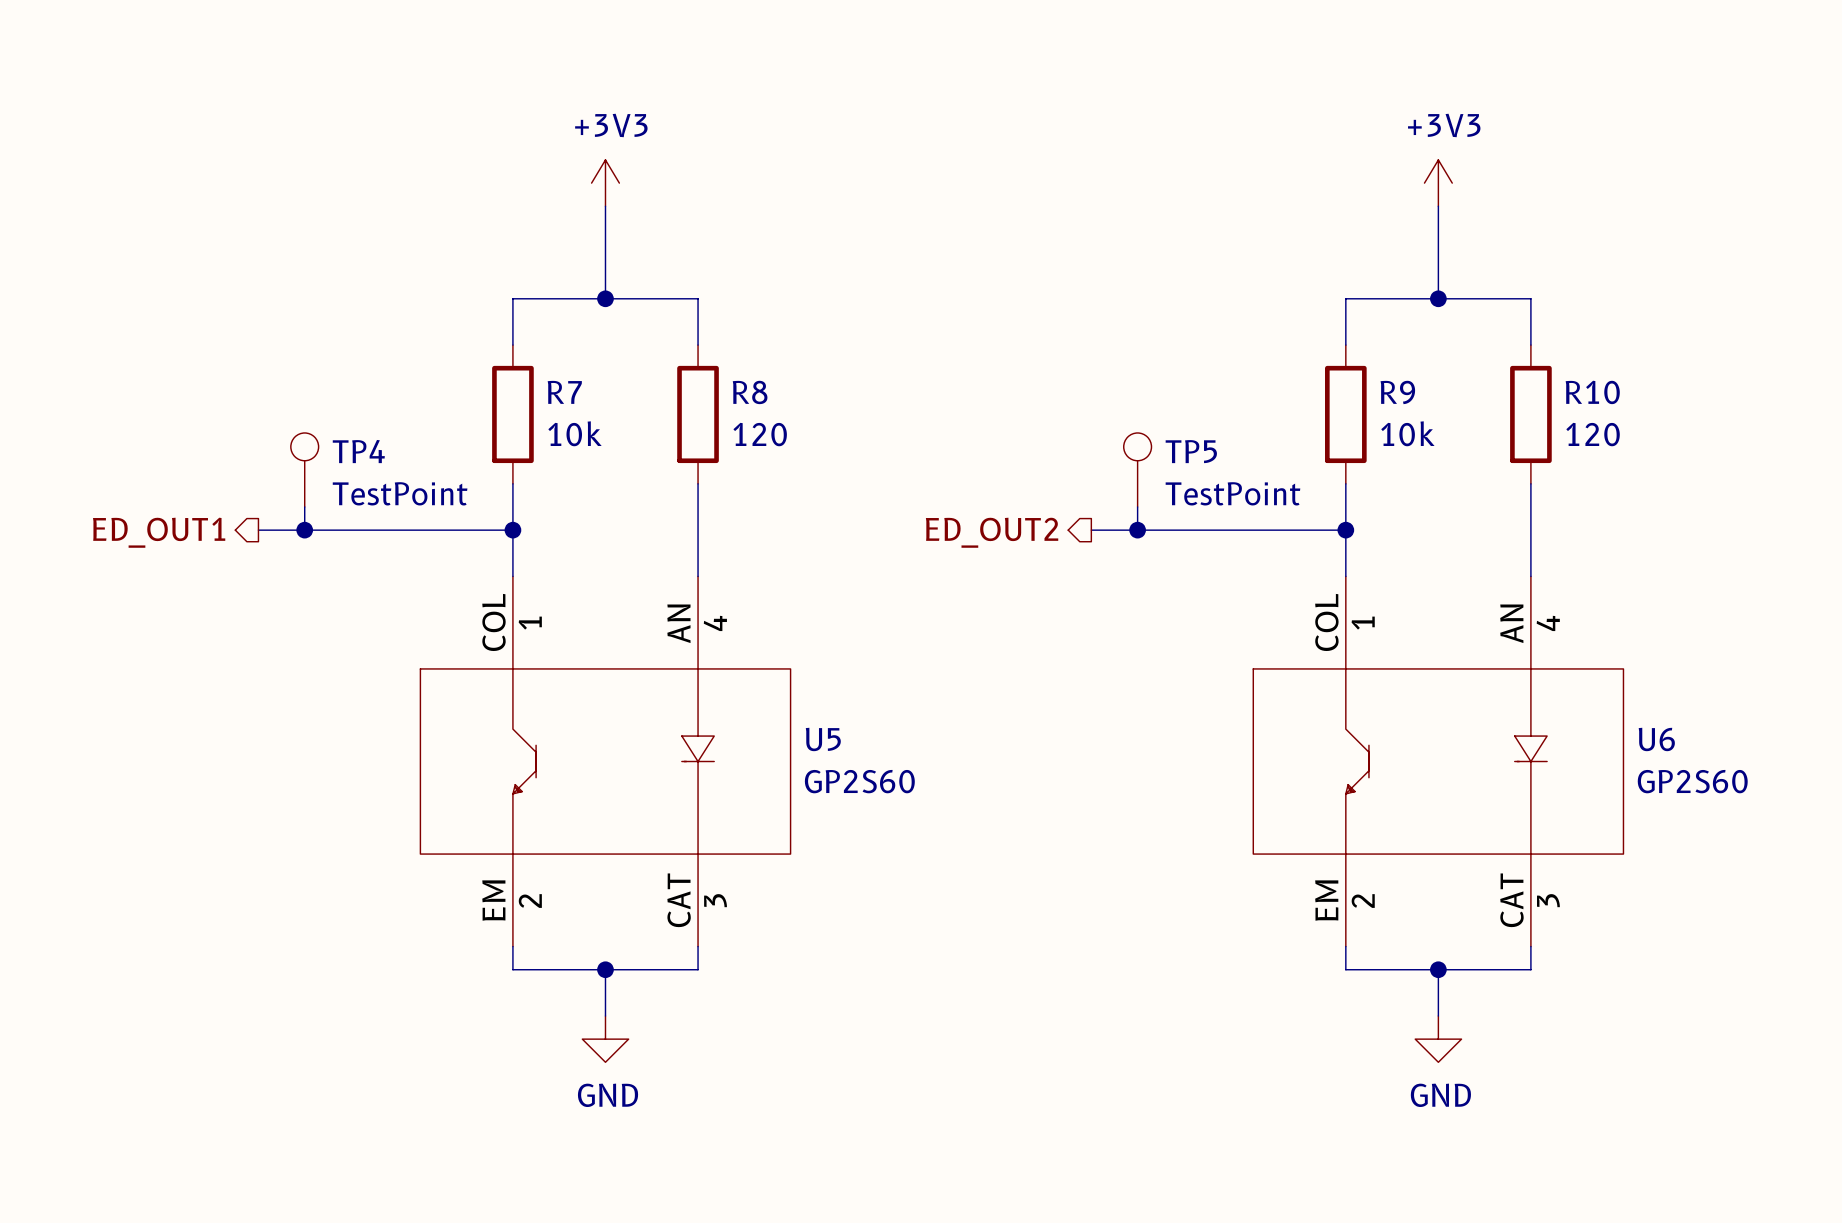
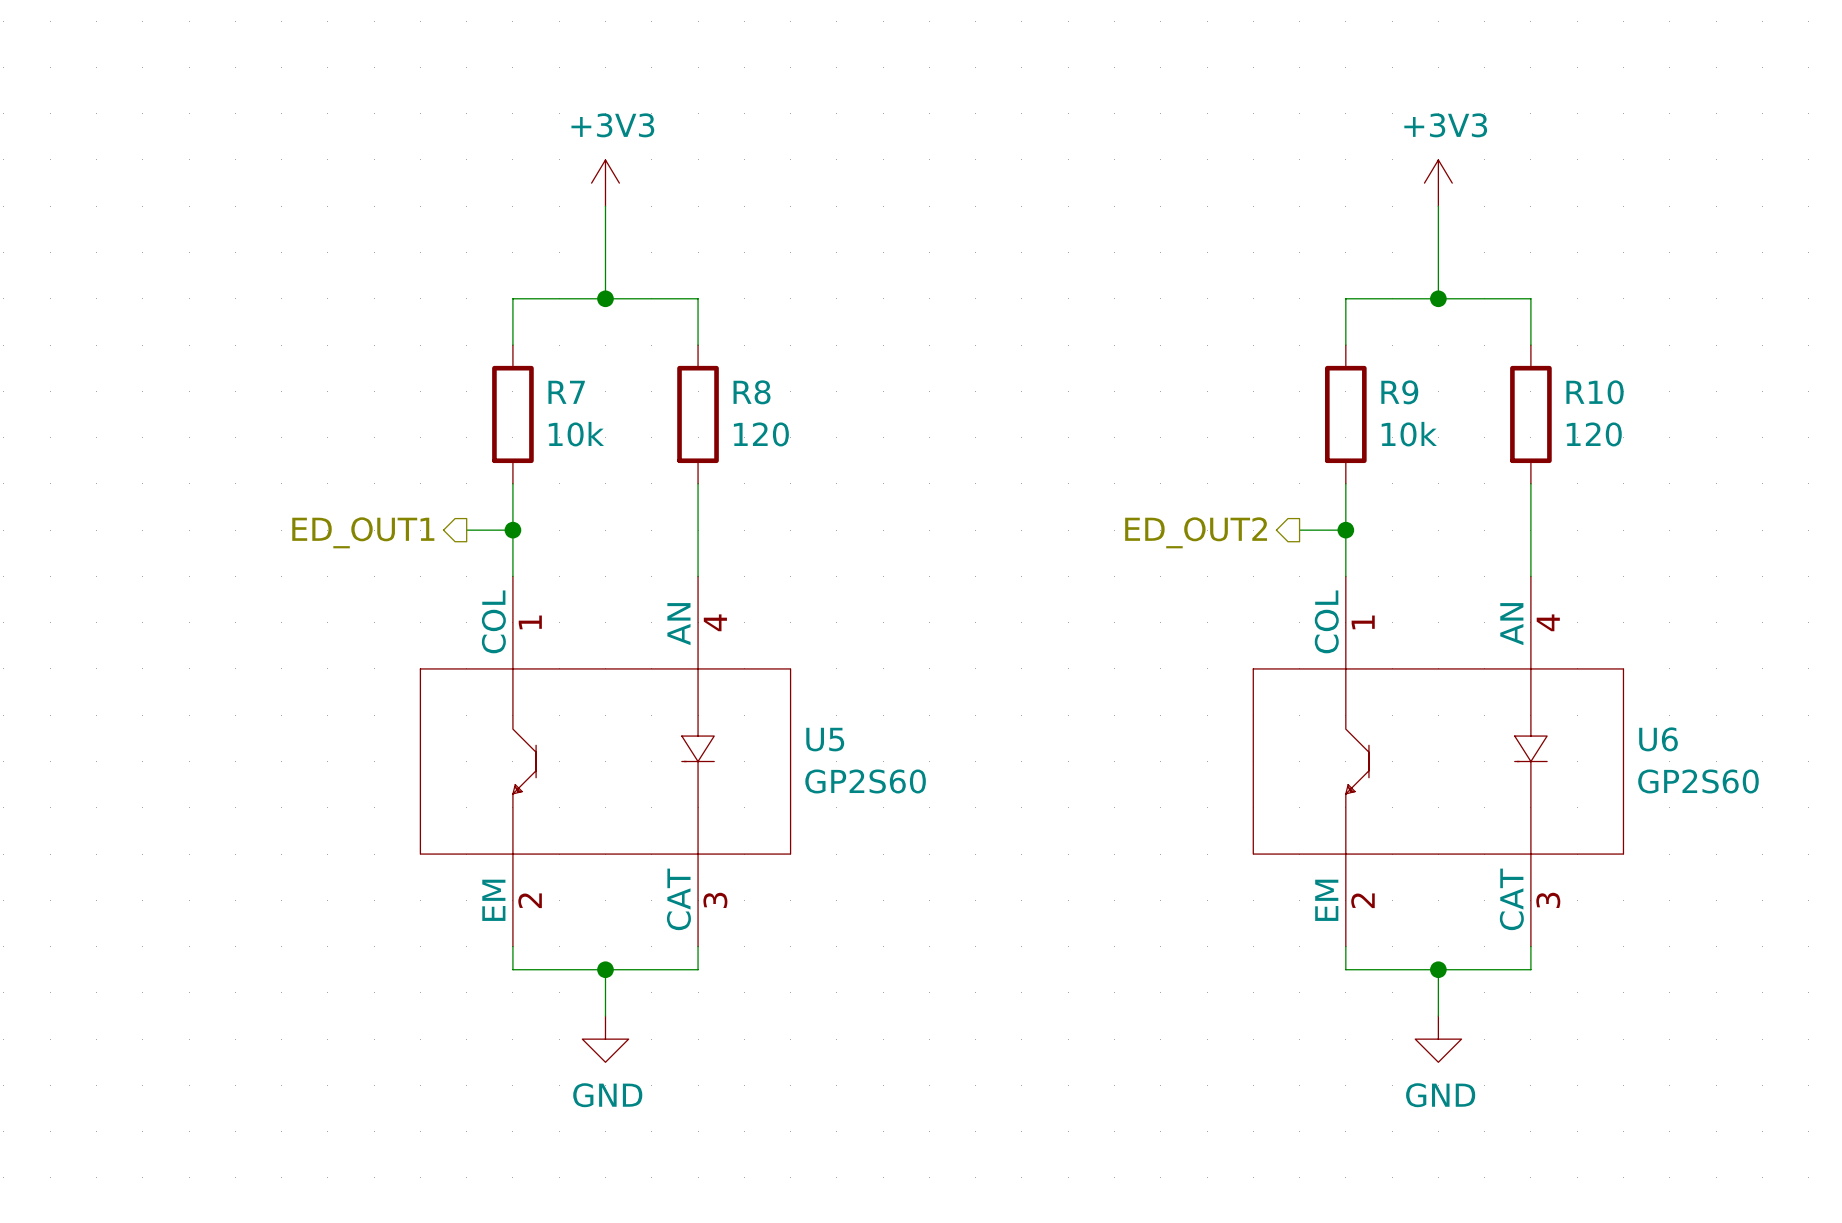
TP4: TestPoint (304, 469) -> none
TP5: TestPoint (1137, 469) -> none
wire: (304, 507) (304, 530) -> none
wire: (1137, 507) (1137, 530) -> none
wire: (258, 530) (466, 530) -> none
junction: (304, 530) -> none
wire: (1091, 530) (1299, 530) -> none
junction: (1137, 530) -> none
hierarchical label position: ED_OUT1 (159, 532) -> ED_OUT1 (363, 532)
hierarchical label position: ED_OUT2 (992, 532) -> ED_OUT2 (1196, 532)

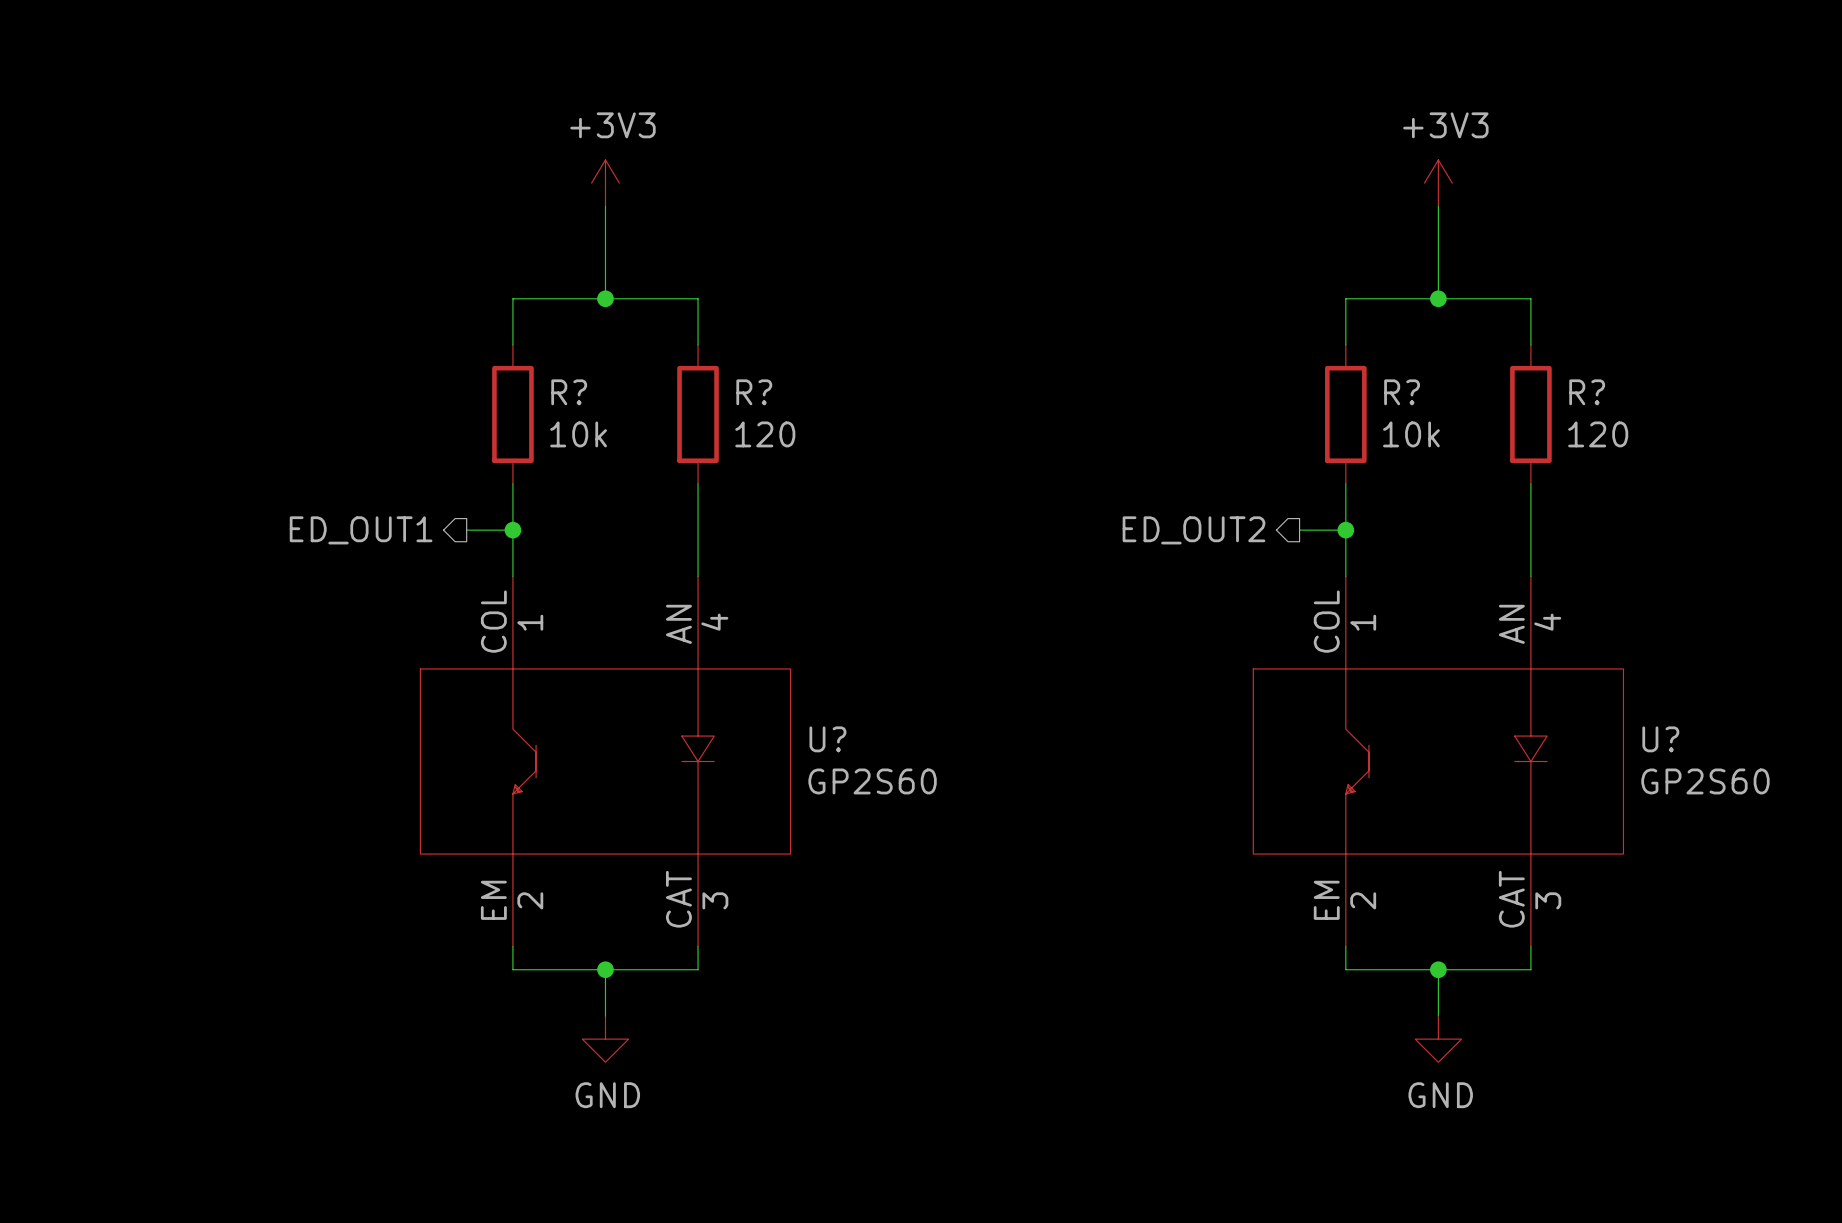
R7 name: R7 (566, 392) -> R? (569, 392)
R8 name: R8 (752, 392) -> R? (754, 392)
R9 name: R9 (1399, 392) -> R? (1402, 392)
R10 name: R10 (1595, 392) -> R? (1587, 392)
U5 name: U5 (825, 739) -> U? (827, 739)
U6 name: U6 (1658, 739) -> U? (1660, 739)

